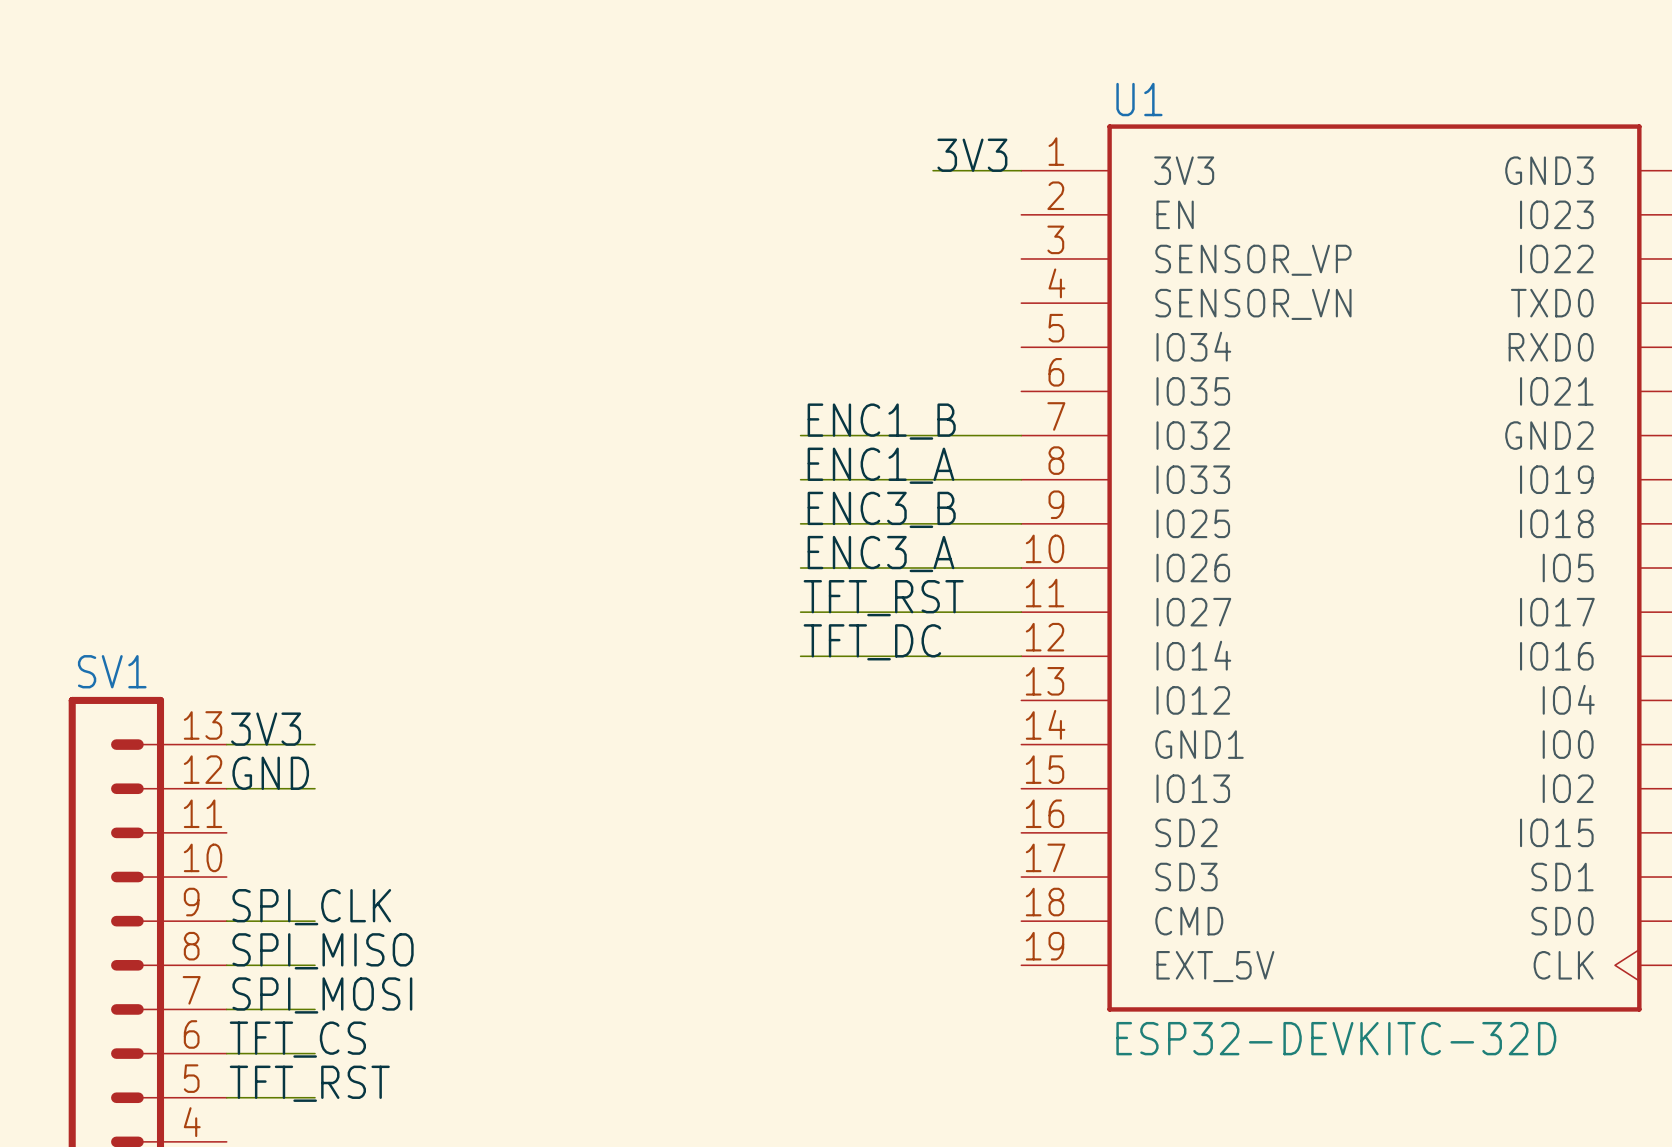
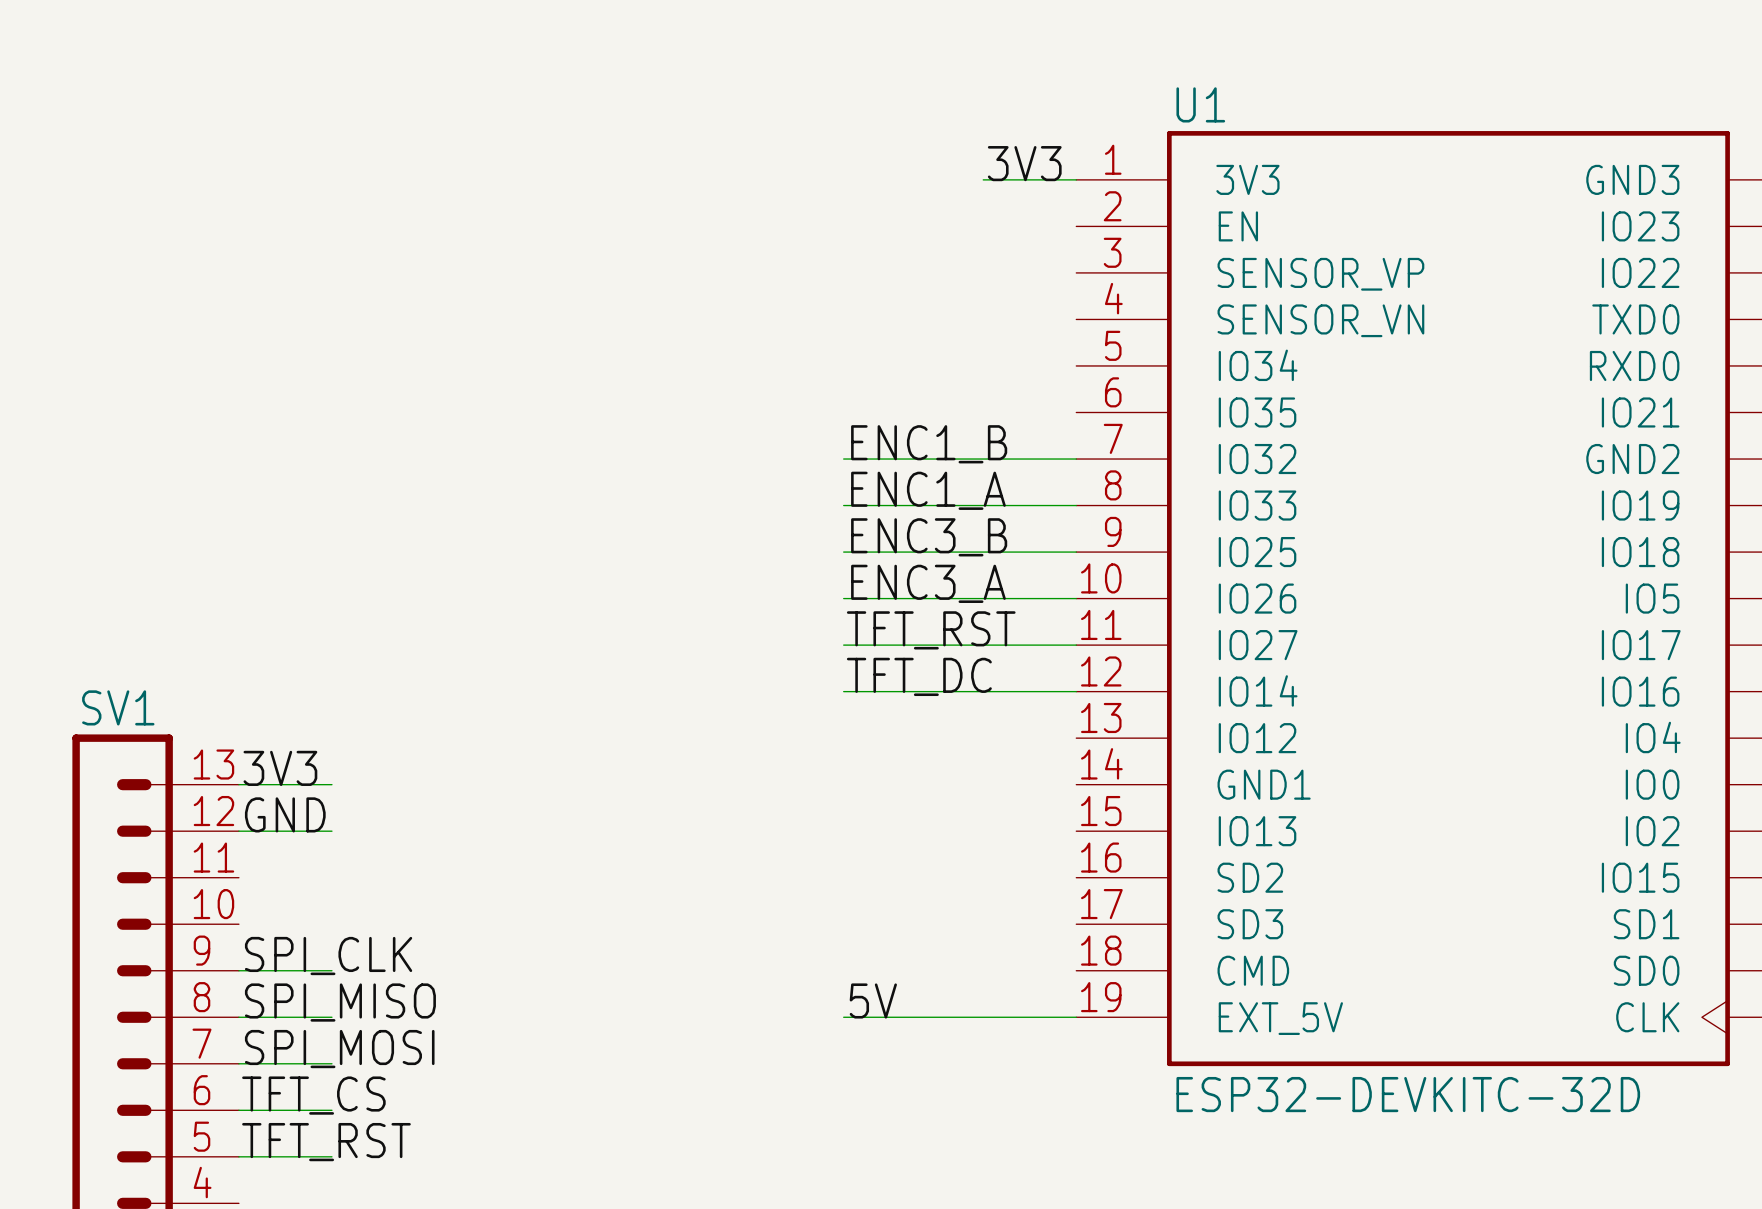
label: none -> 5V (873, 1000)
wire: none -> (843, 1017) (1076, 1017)

